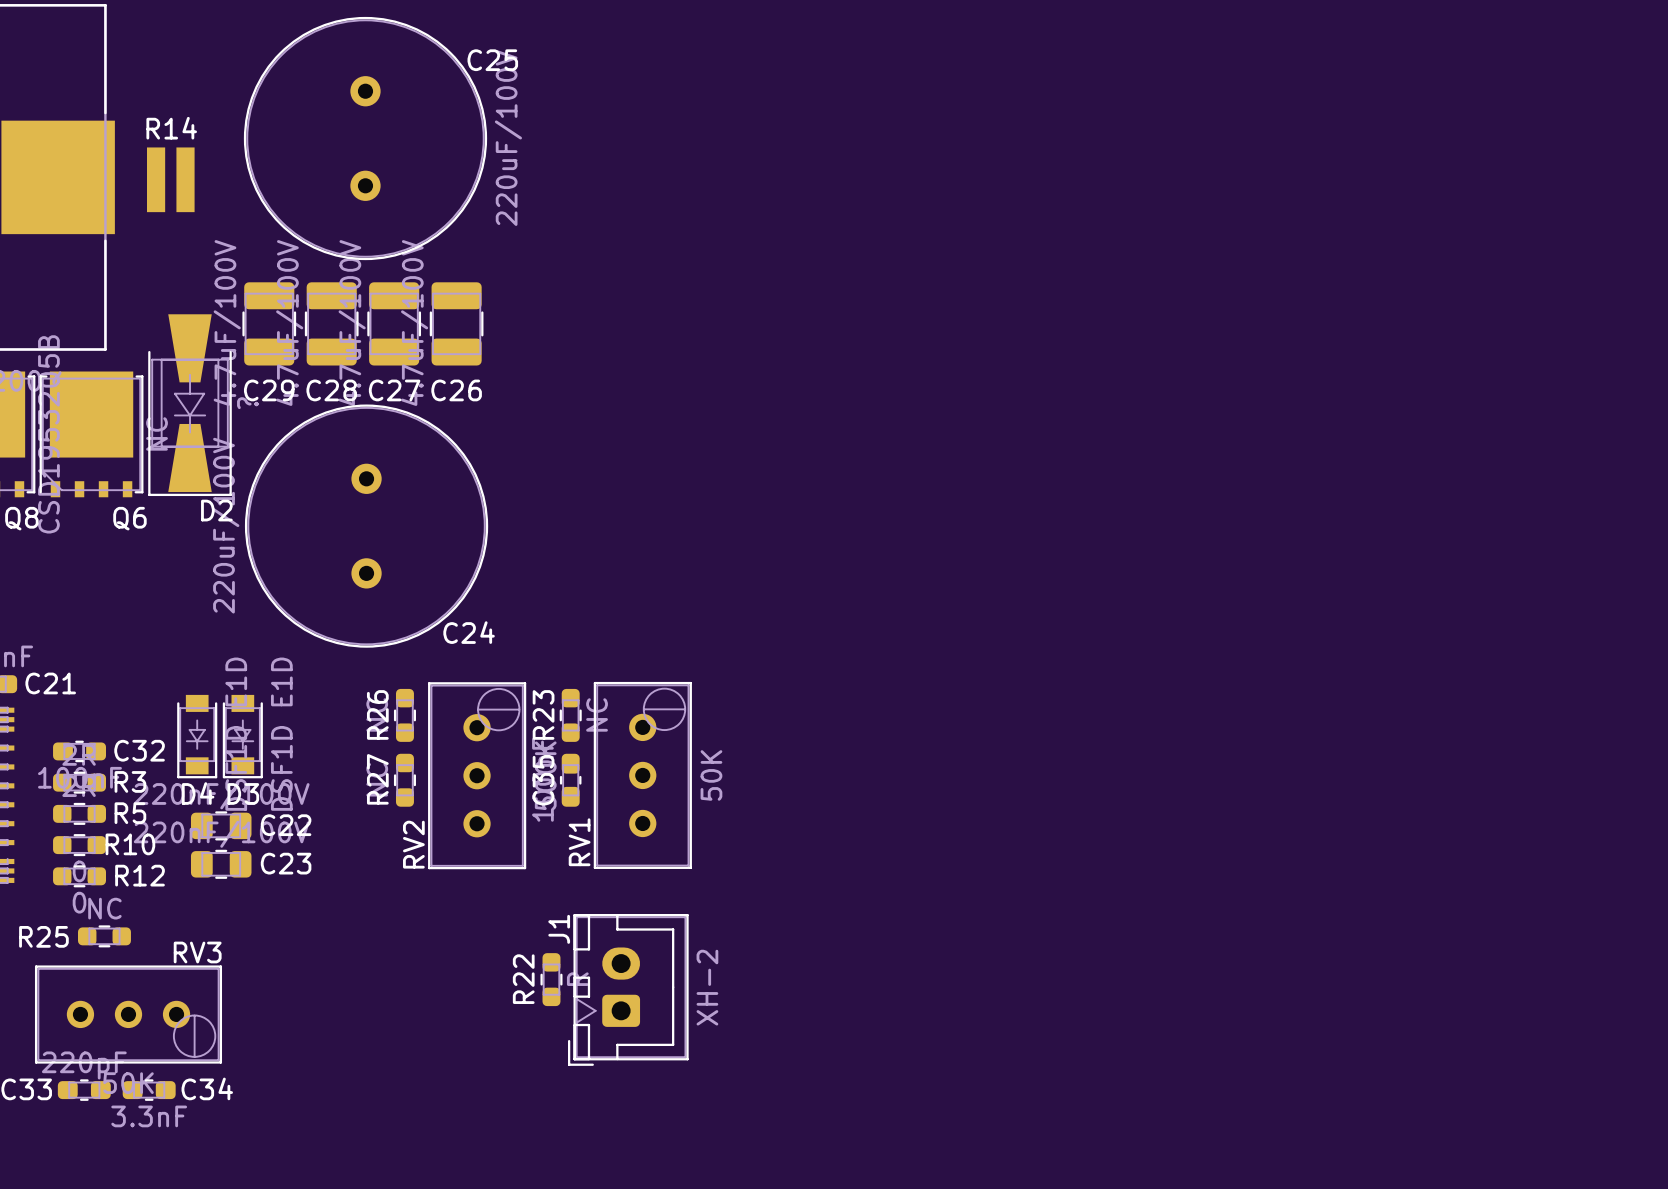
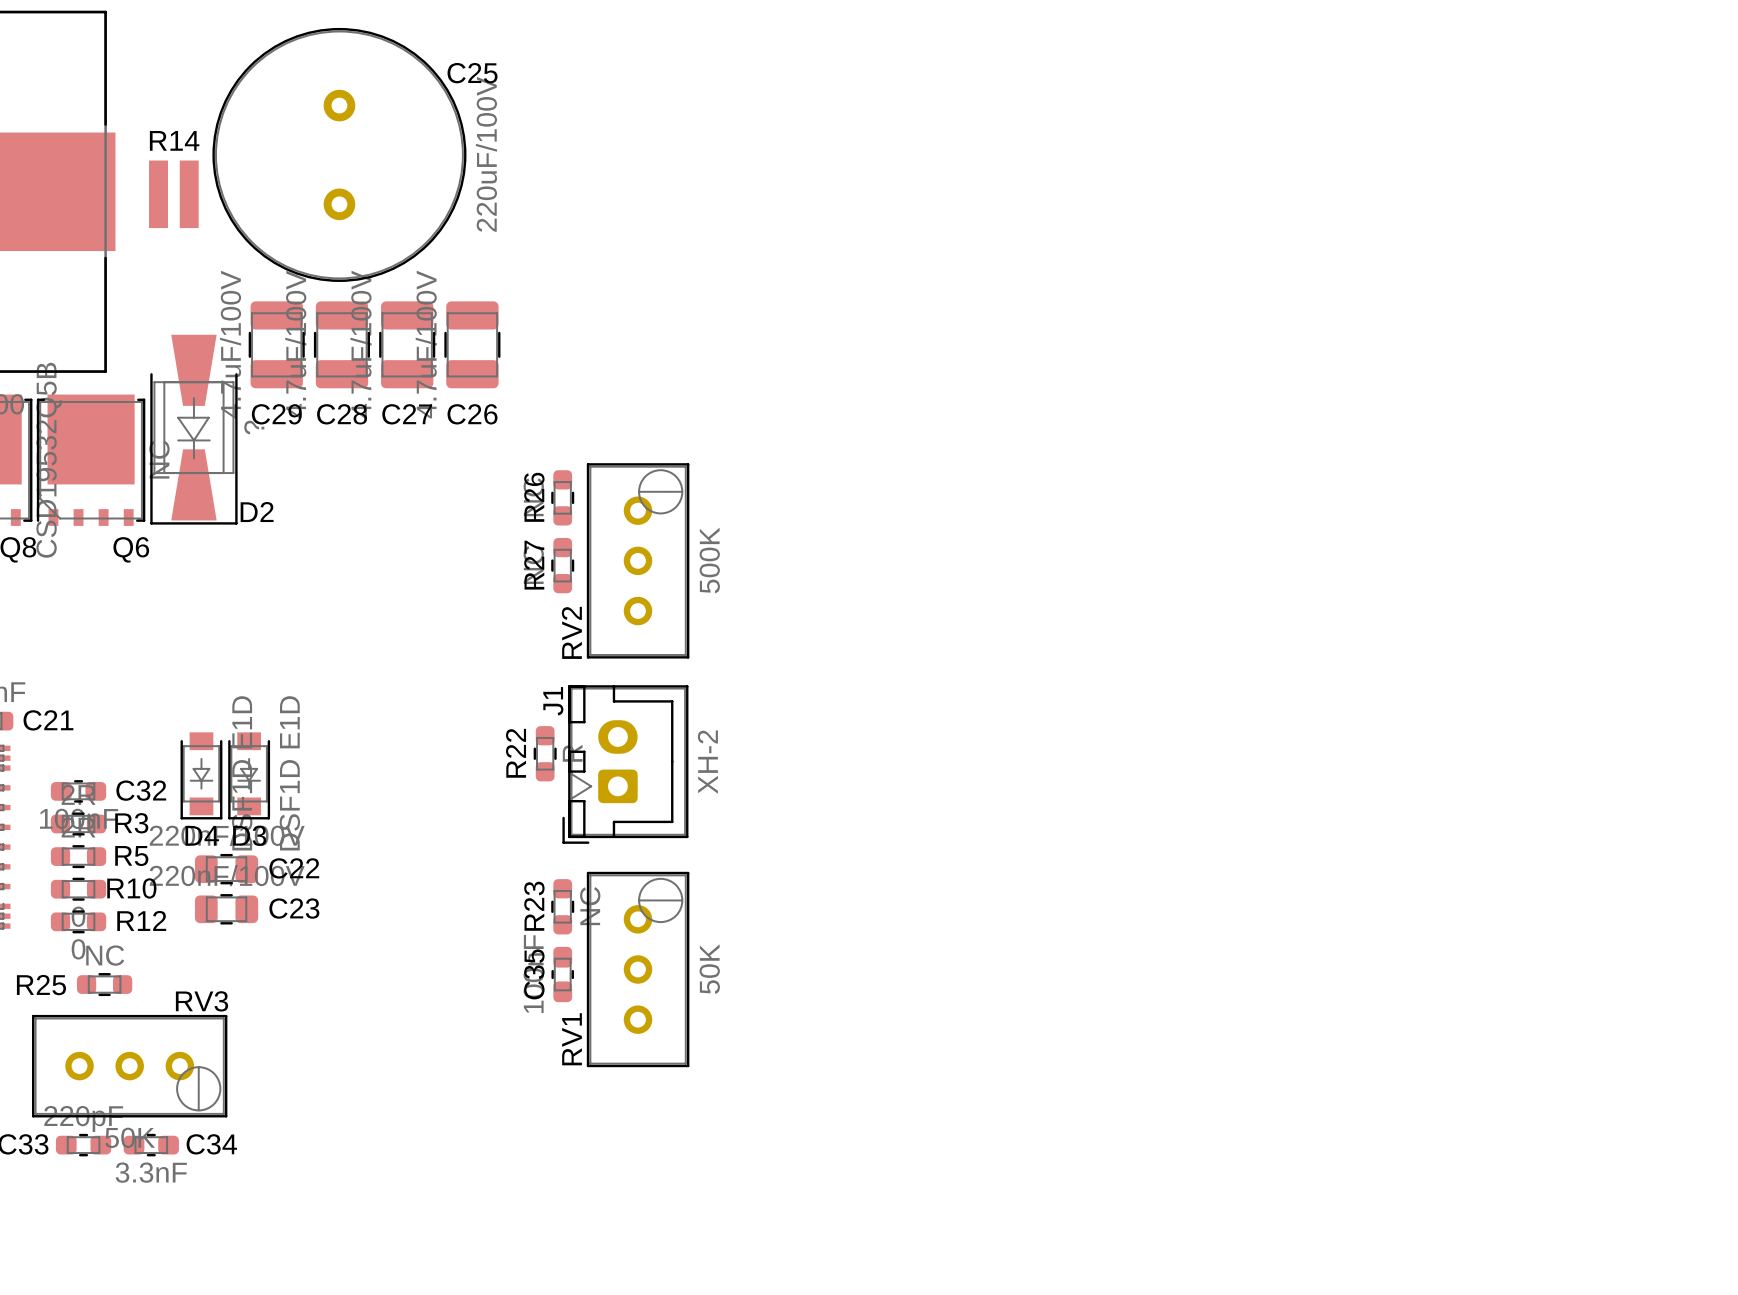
C25 position: (365, 138) -> (339, 154)
D2 name position: D2 (216, 510) -> D2 (257, 512)
C24: 220uF/100V (366, 526) -> none
RV1 footprint: [593, 681, 692, 869] -> [586, 871, 690, 1068]
RV2 footprint: [428, 682, 527, 870] -> [586, 463, 690, 659]
R26 position: (404, 715) -> (562, 497)
R23 position: (570, 715) -> (562, 906)
R27 position: (404, 780) -> (562, 565)
C35 position: (570, 780) -> (562, 974)
R22 position: (551, 979) -> (545, 753)
J1 position: (628, 989) -> (625, 764)

